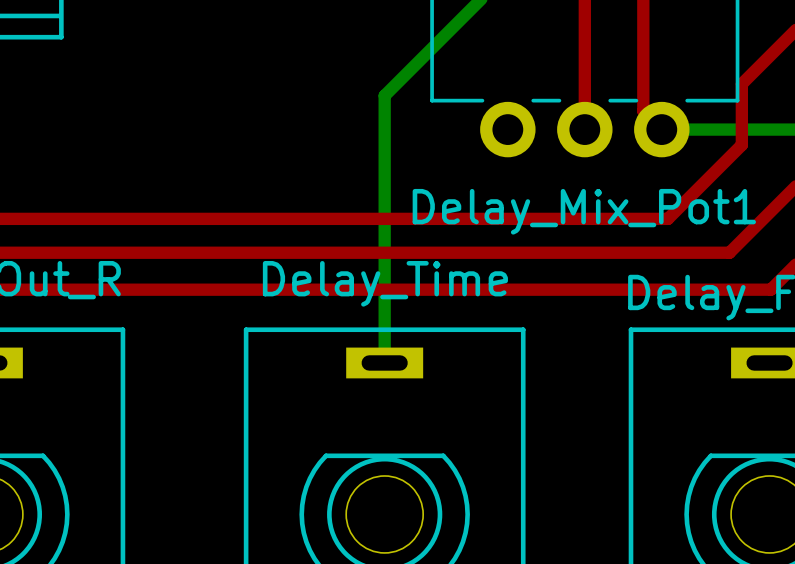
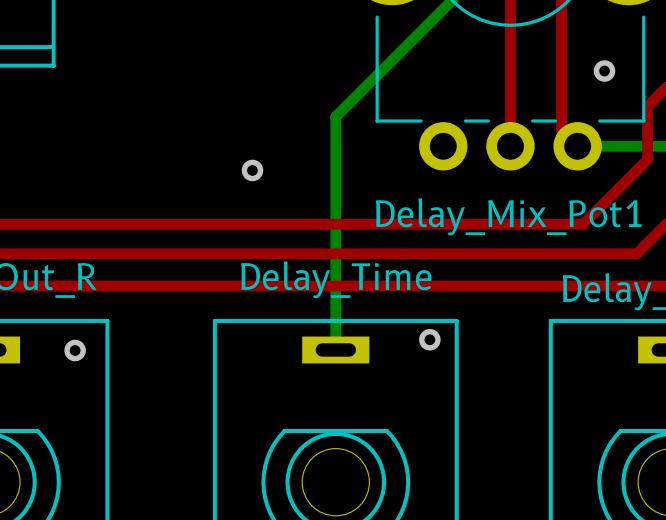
via: none -> (604, 71)
via: none -> (252, 170)
via: none -> (429, 339)
via: none -> (75, 350)

